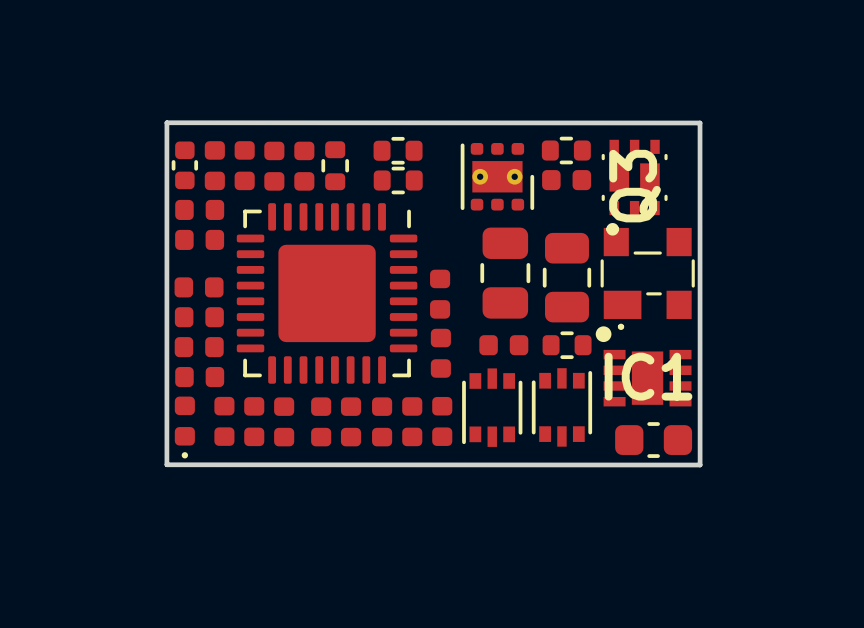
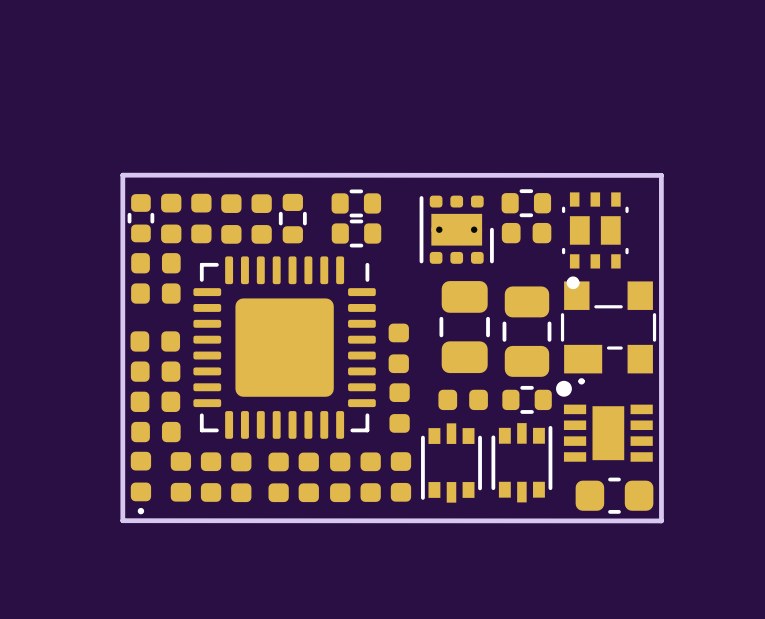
Q3 name: Q3 (635, 186) -> none
IC1 name: IC1 (648, 376) -> none

